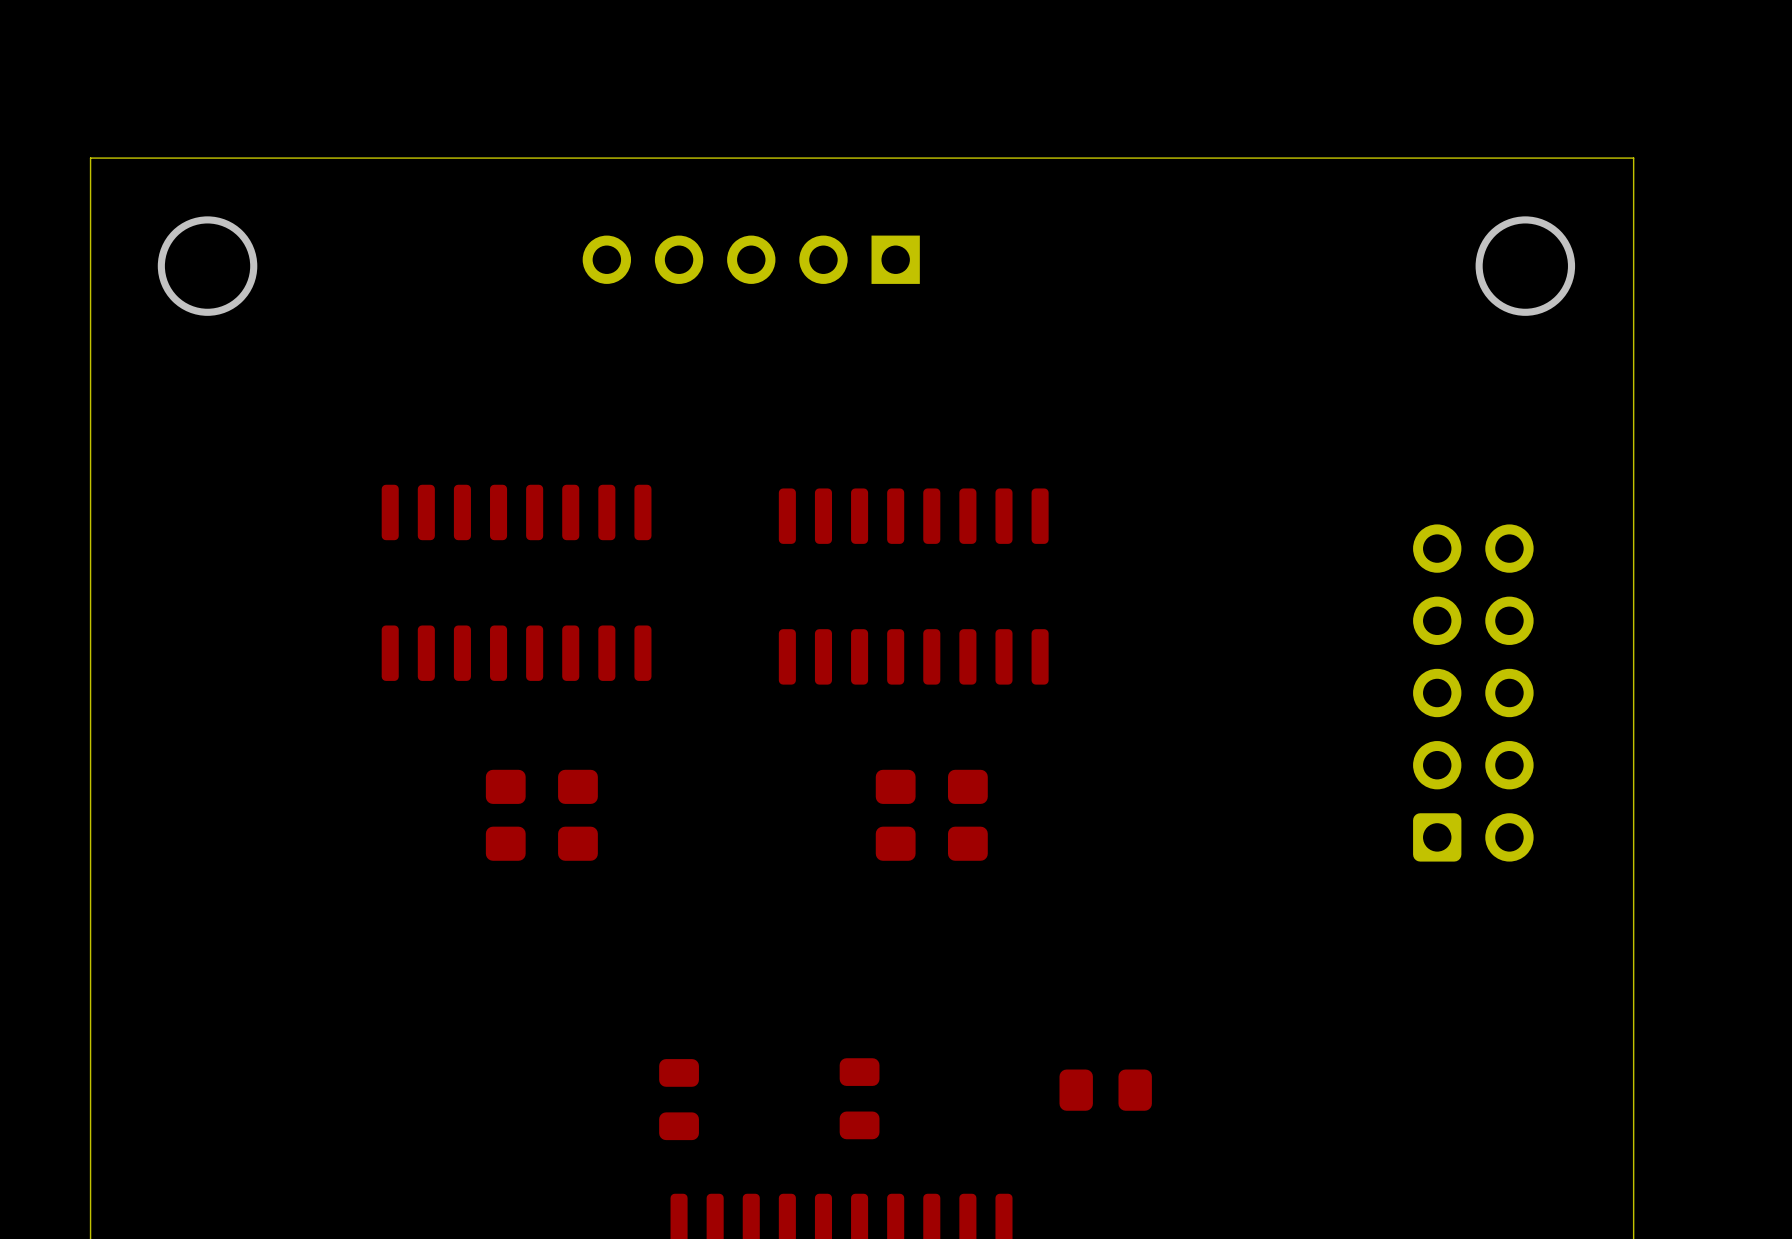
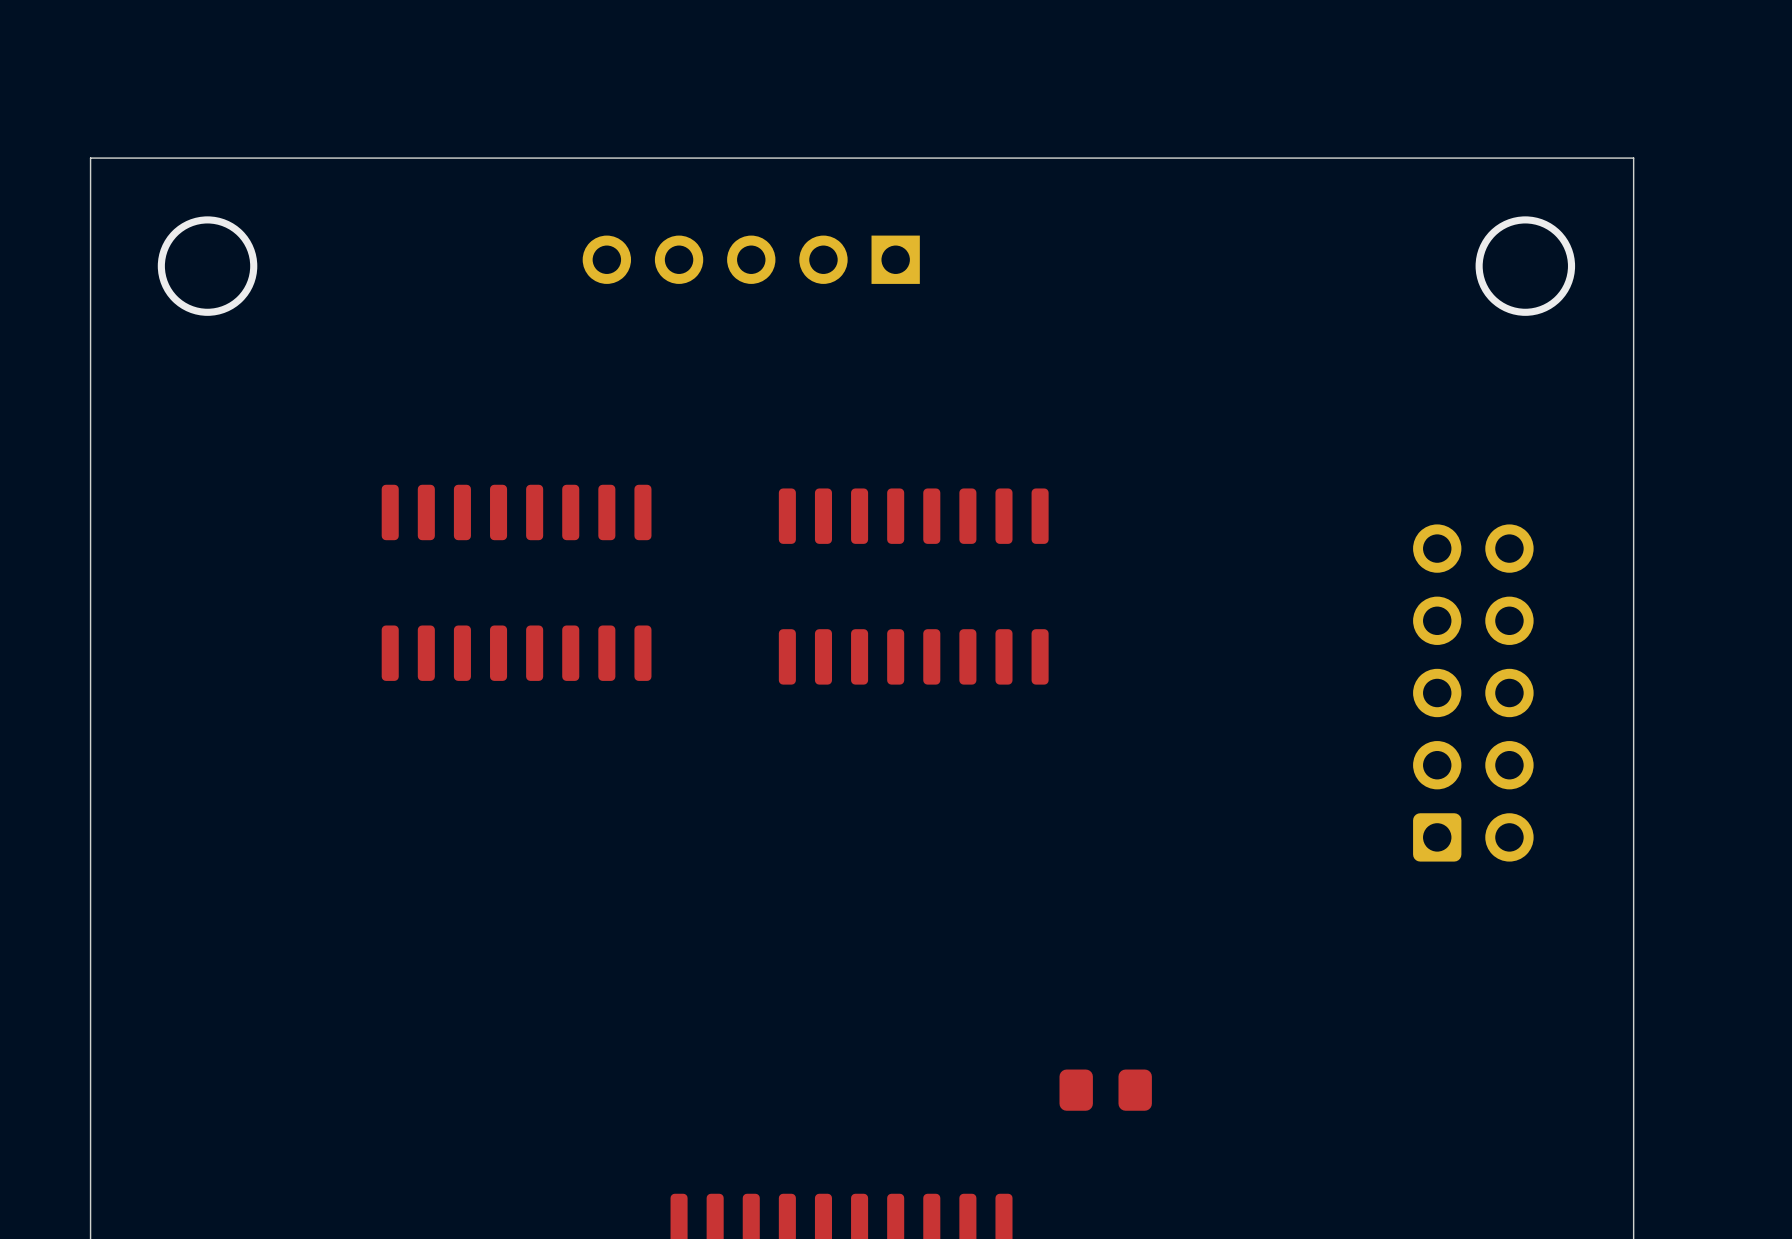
part: (505, 815) -> none
part: (577, 815) -> none
part: (895, 815) -> none
part: (967, 815) -> none
part: (859, 1098) -> none
part: (679, 1099) -> none

